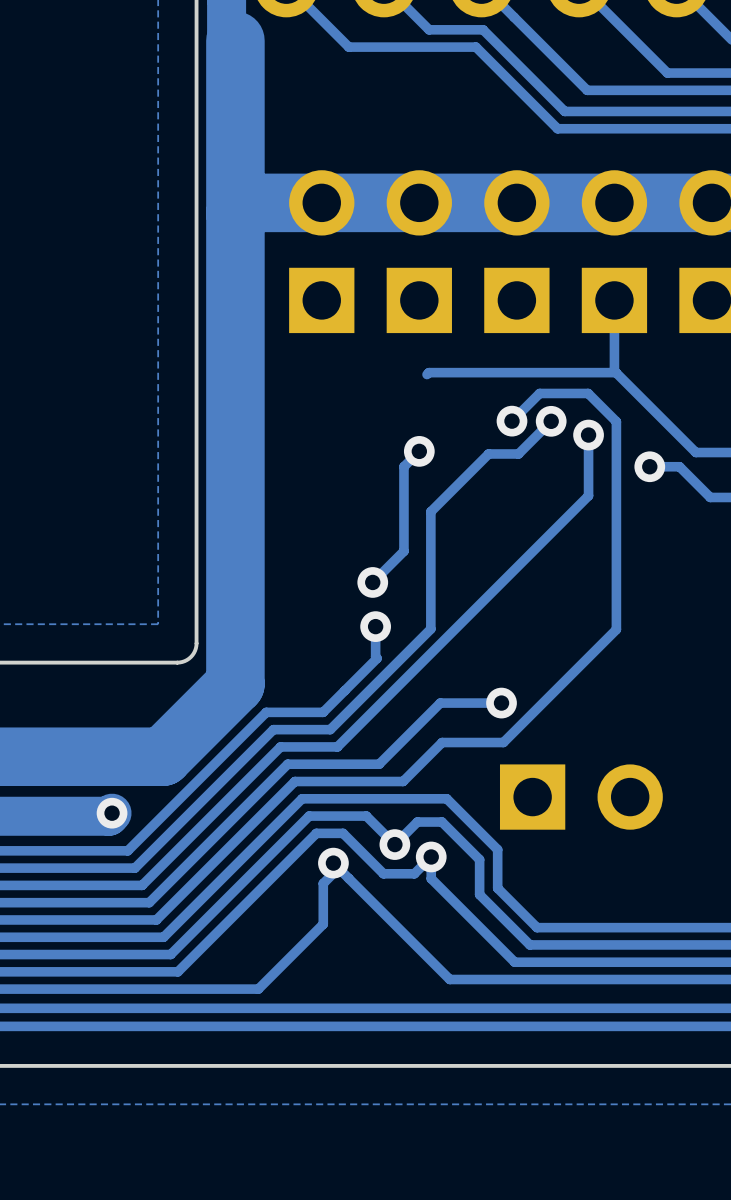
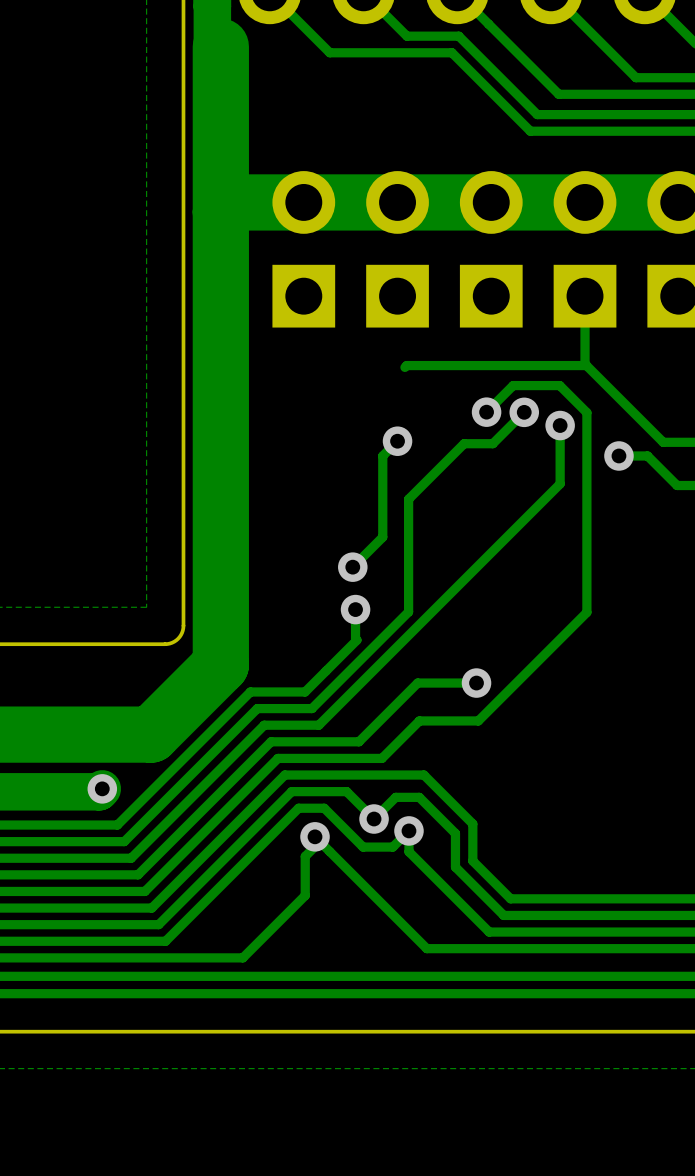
part: (581, 797) -> none

